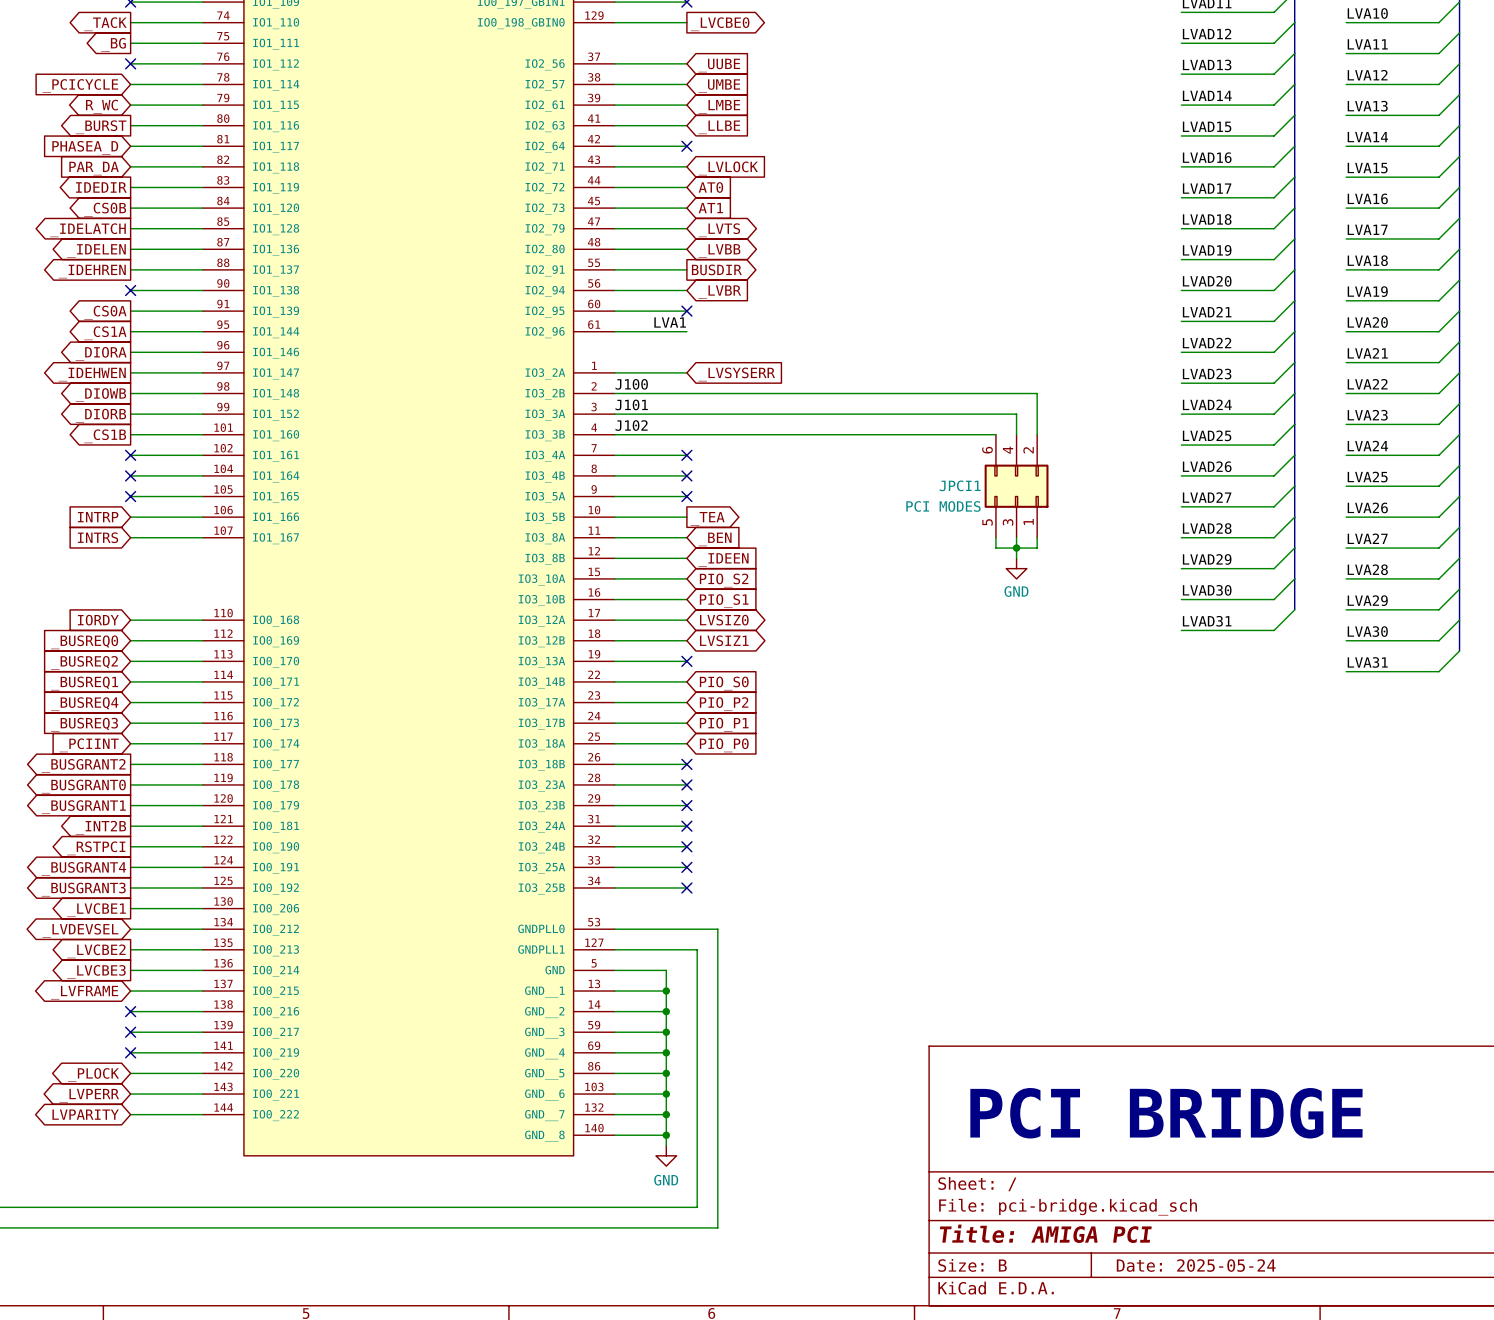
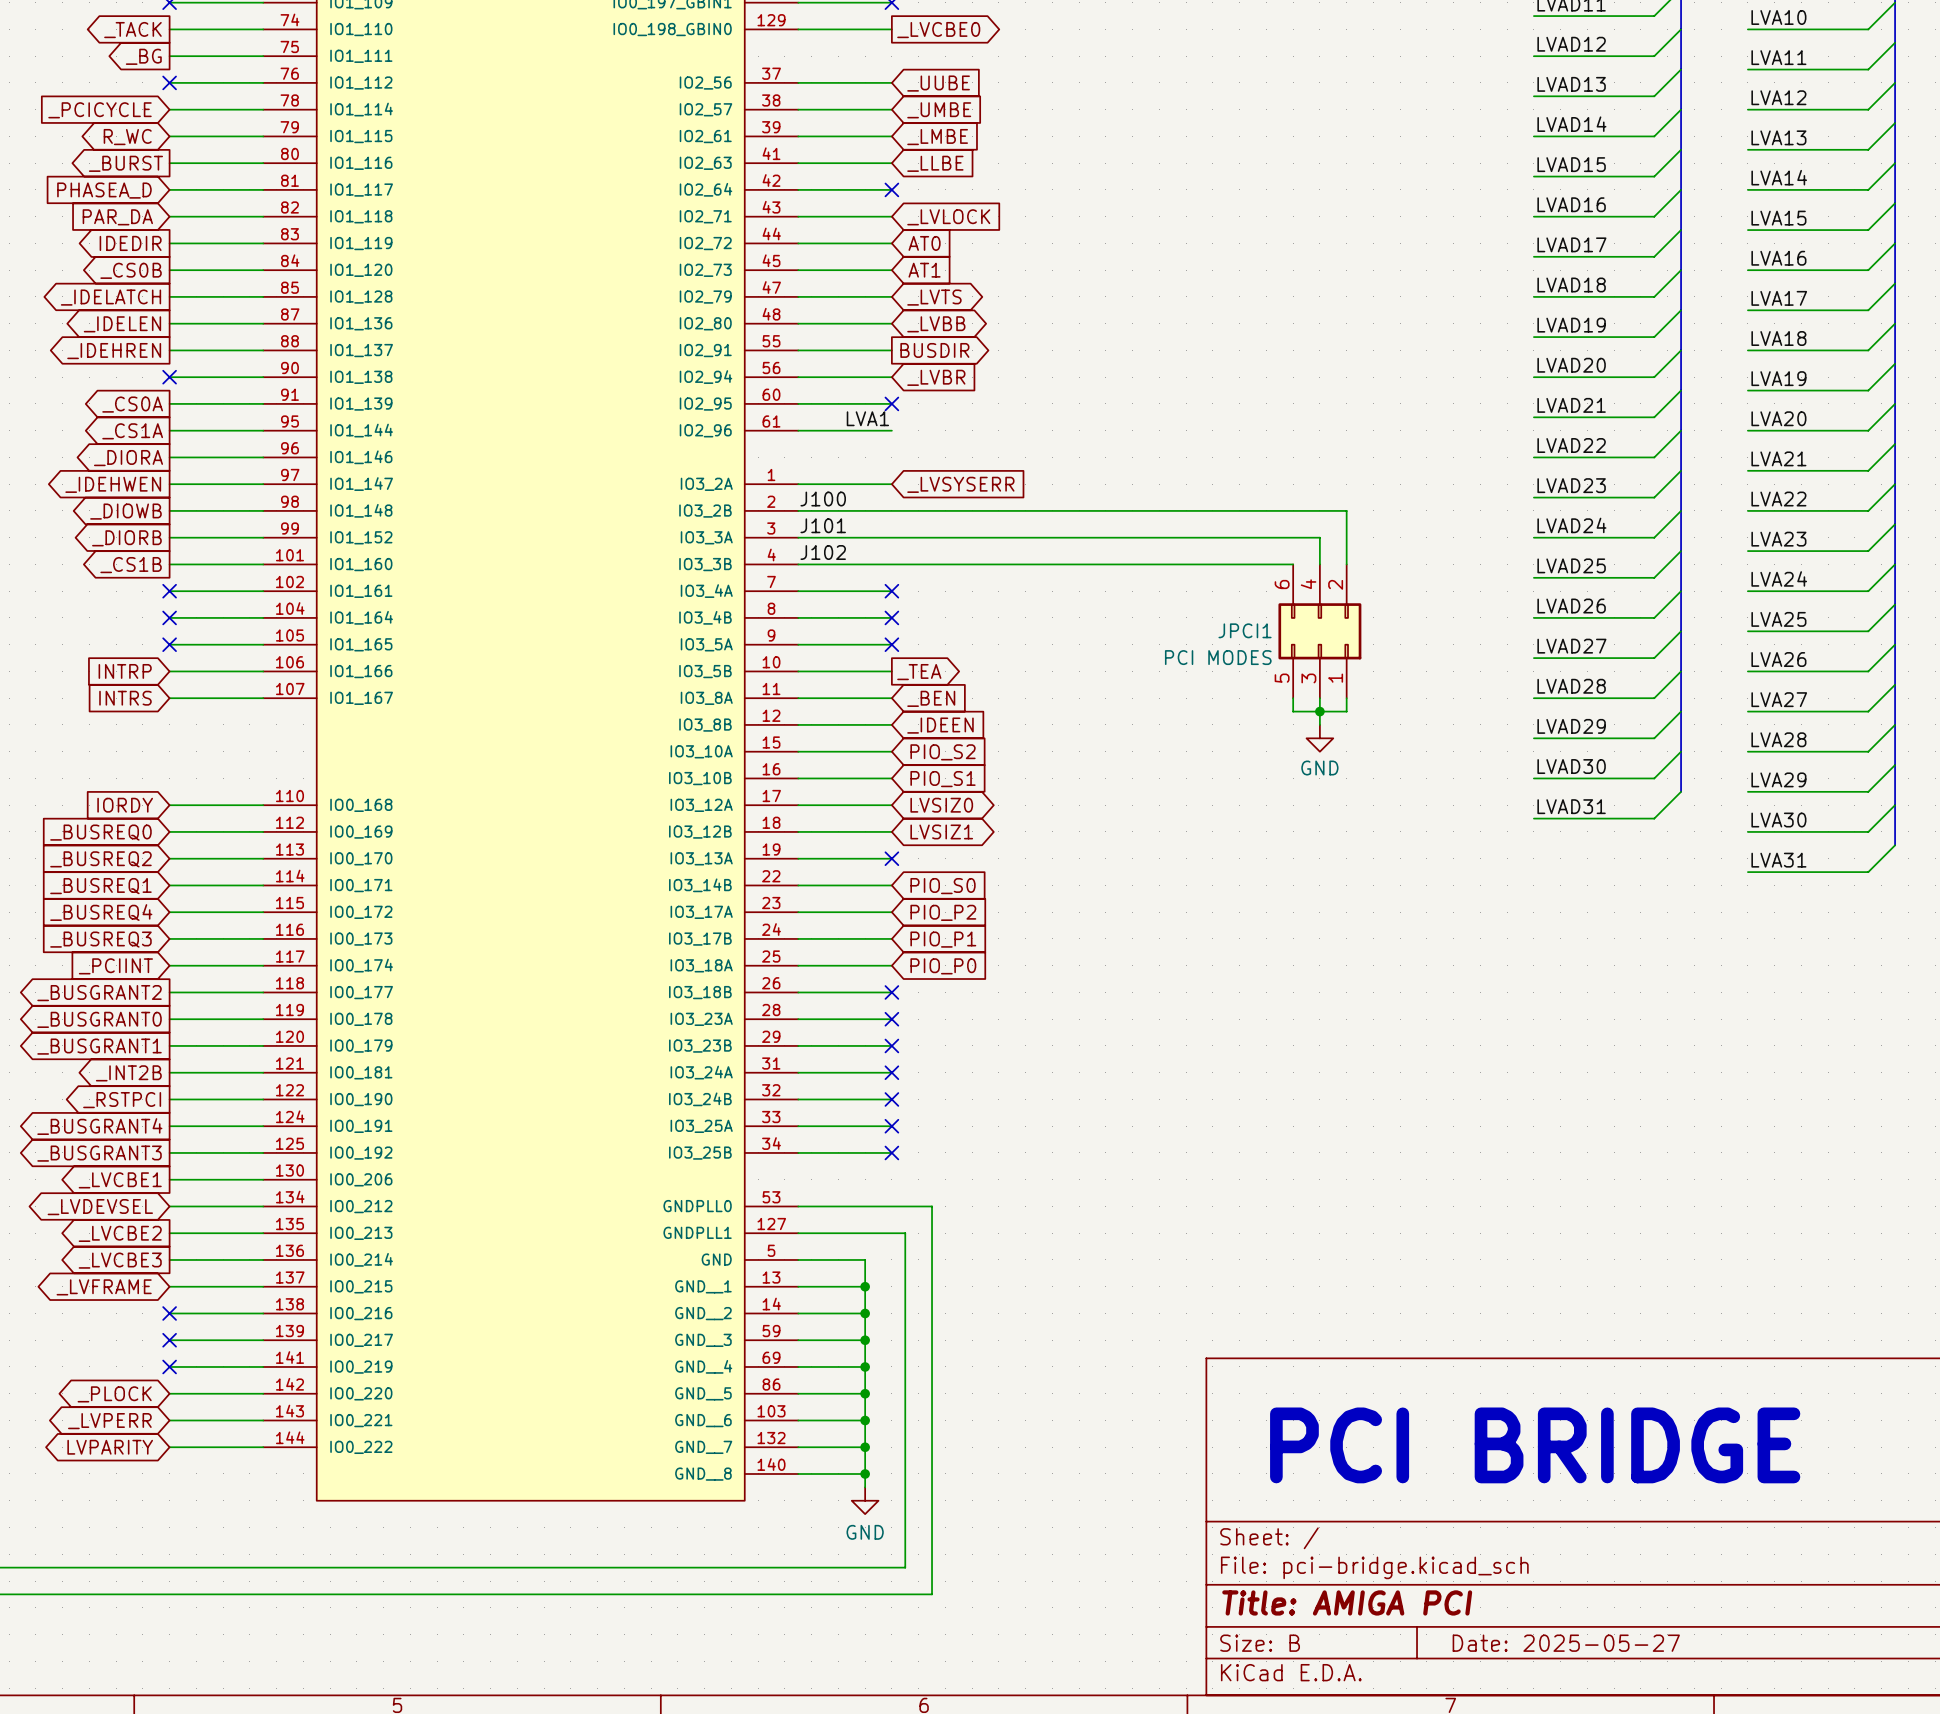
title block: Date: 2025-05-24 (1196, 1265) -> Date: 2025-05-27 (1566, 1643)

